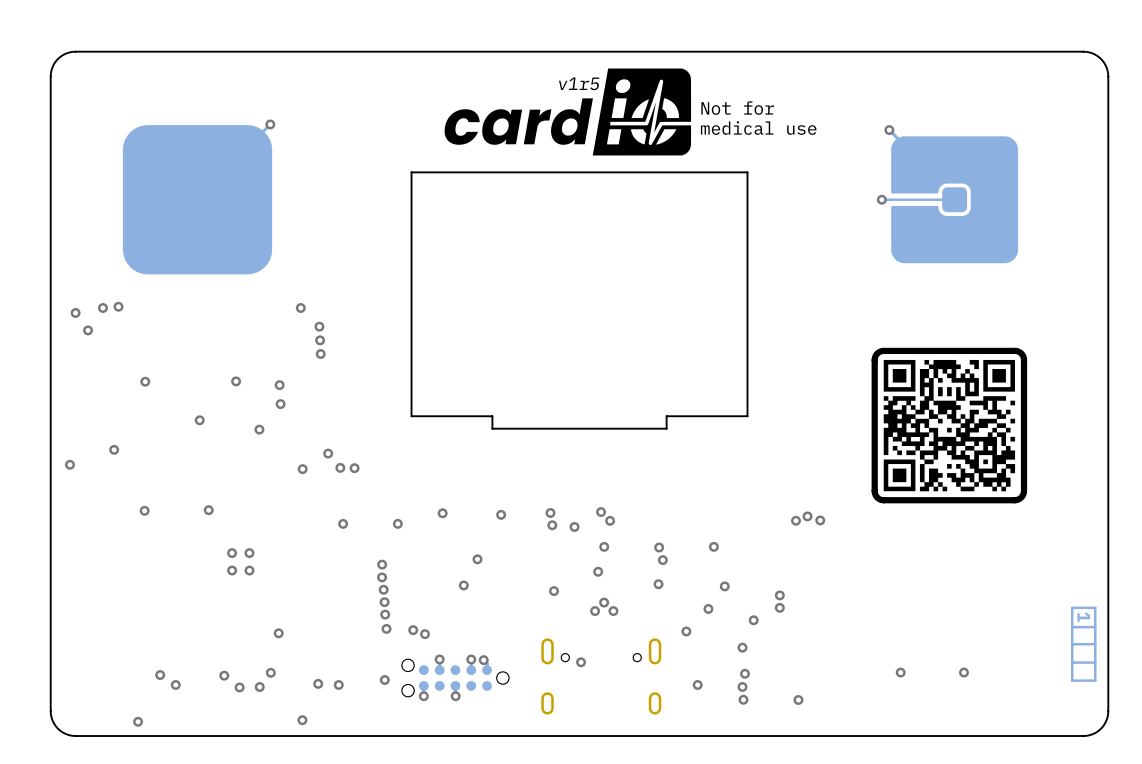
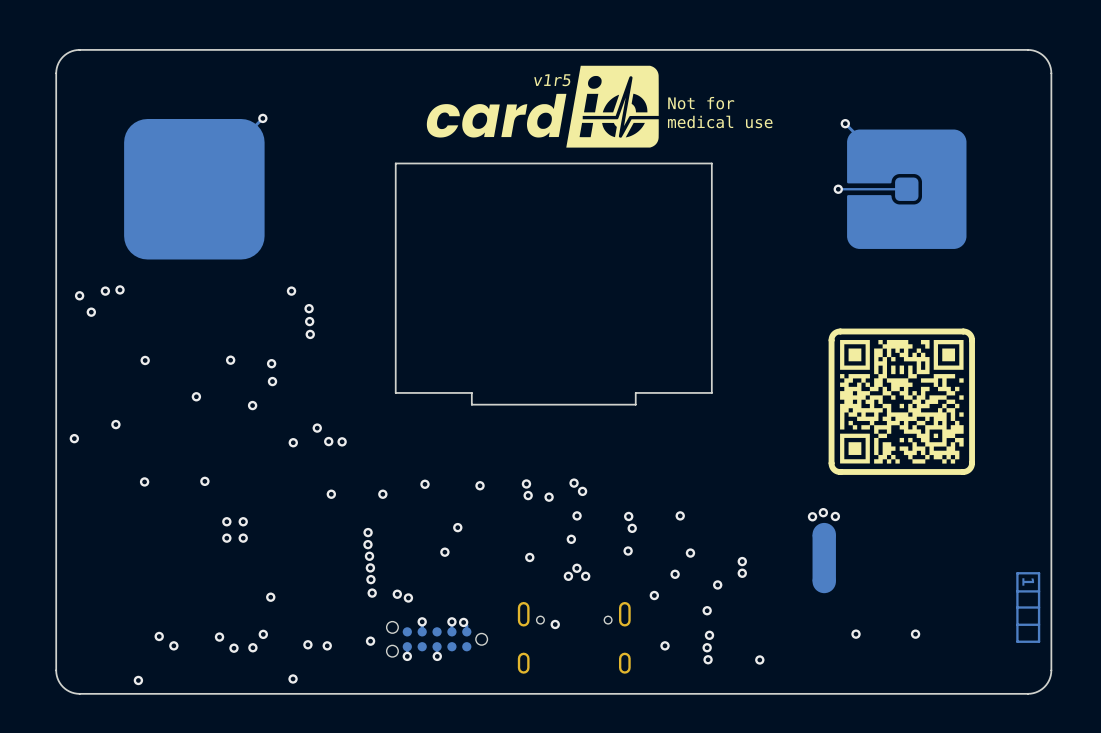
via: (807, 516) -> none
via: (796, 520) -> none
via: (820, 520) -> none
via: none -> (823, 512)
via: none -> (812, 516)
via: none -> (835, 516)
part: none -> (824, 558)

